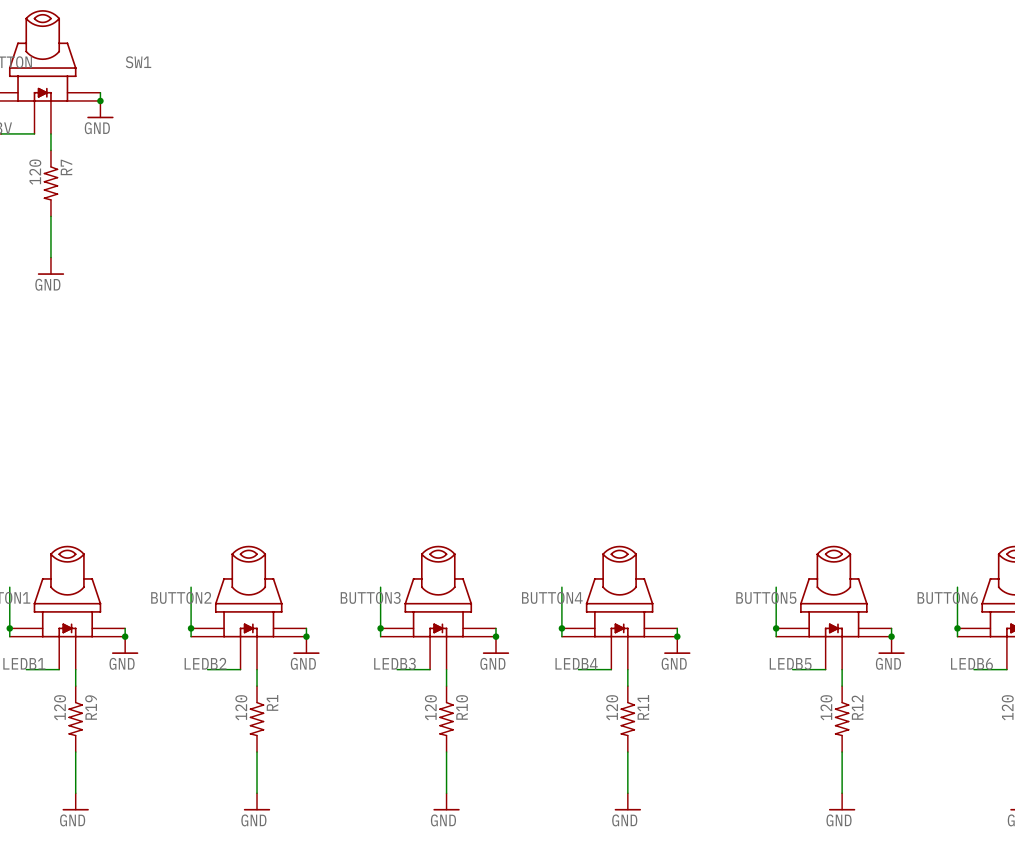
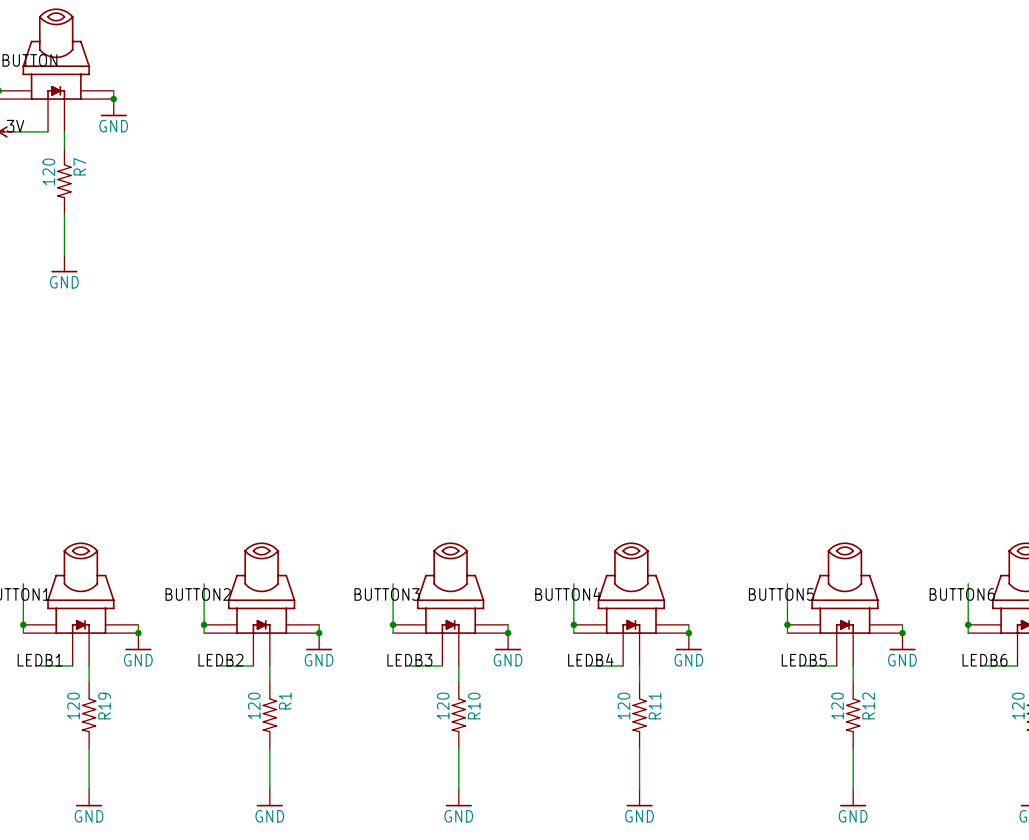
label: SW1 (138, 62) -> none

